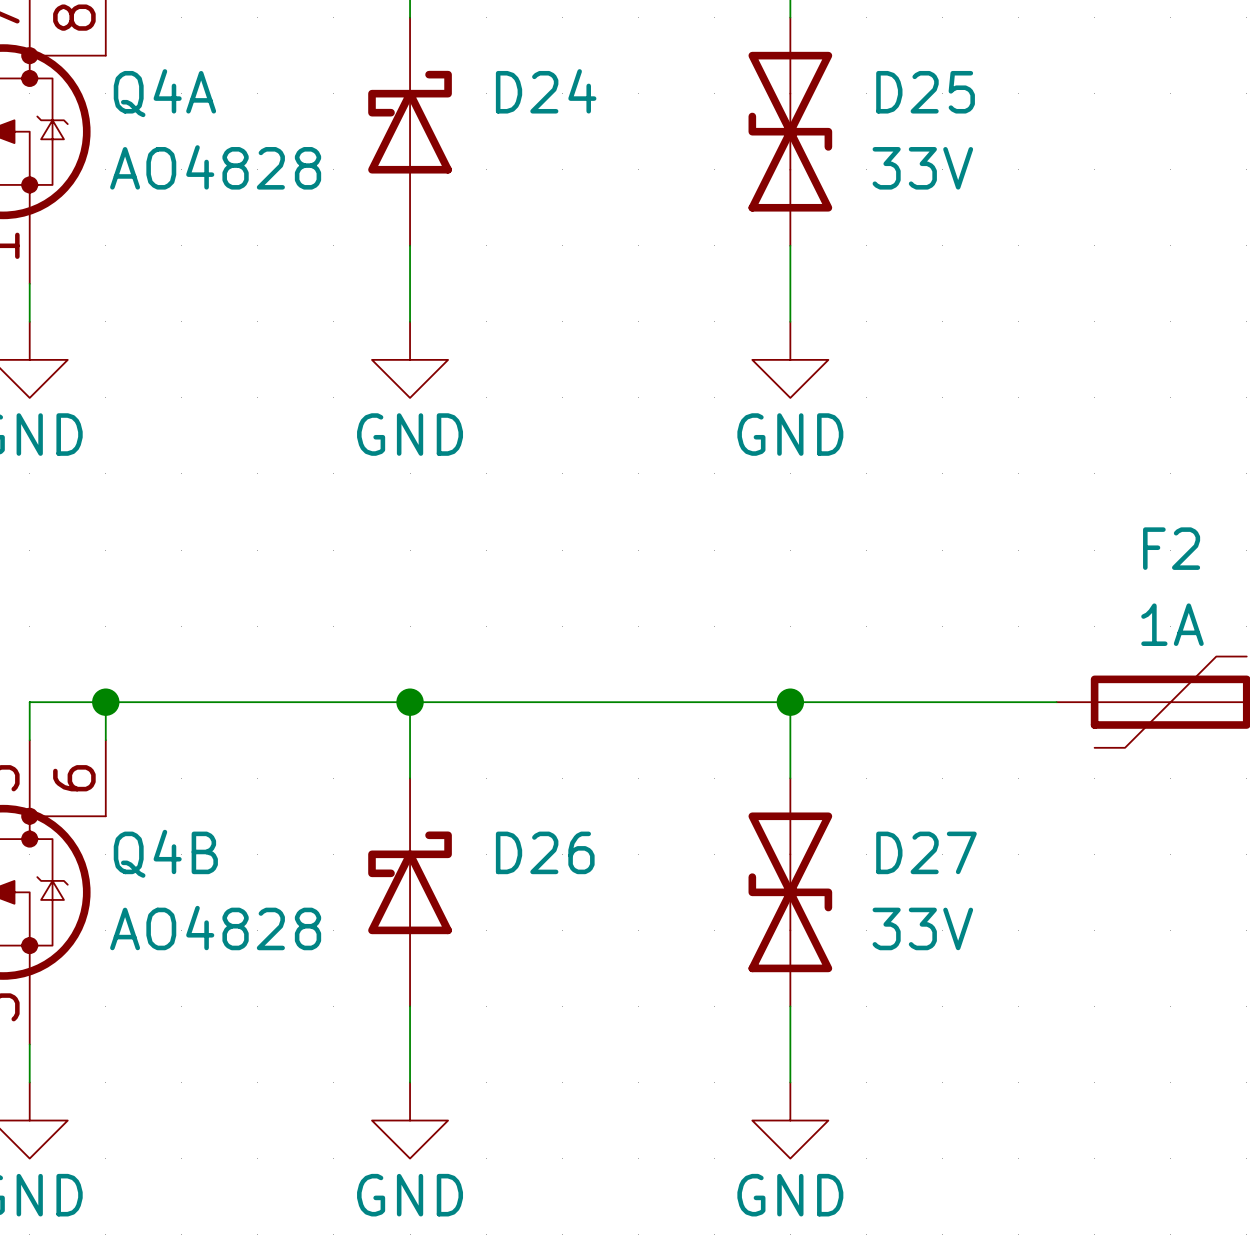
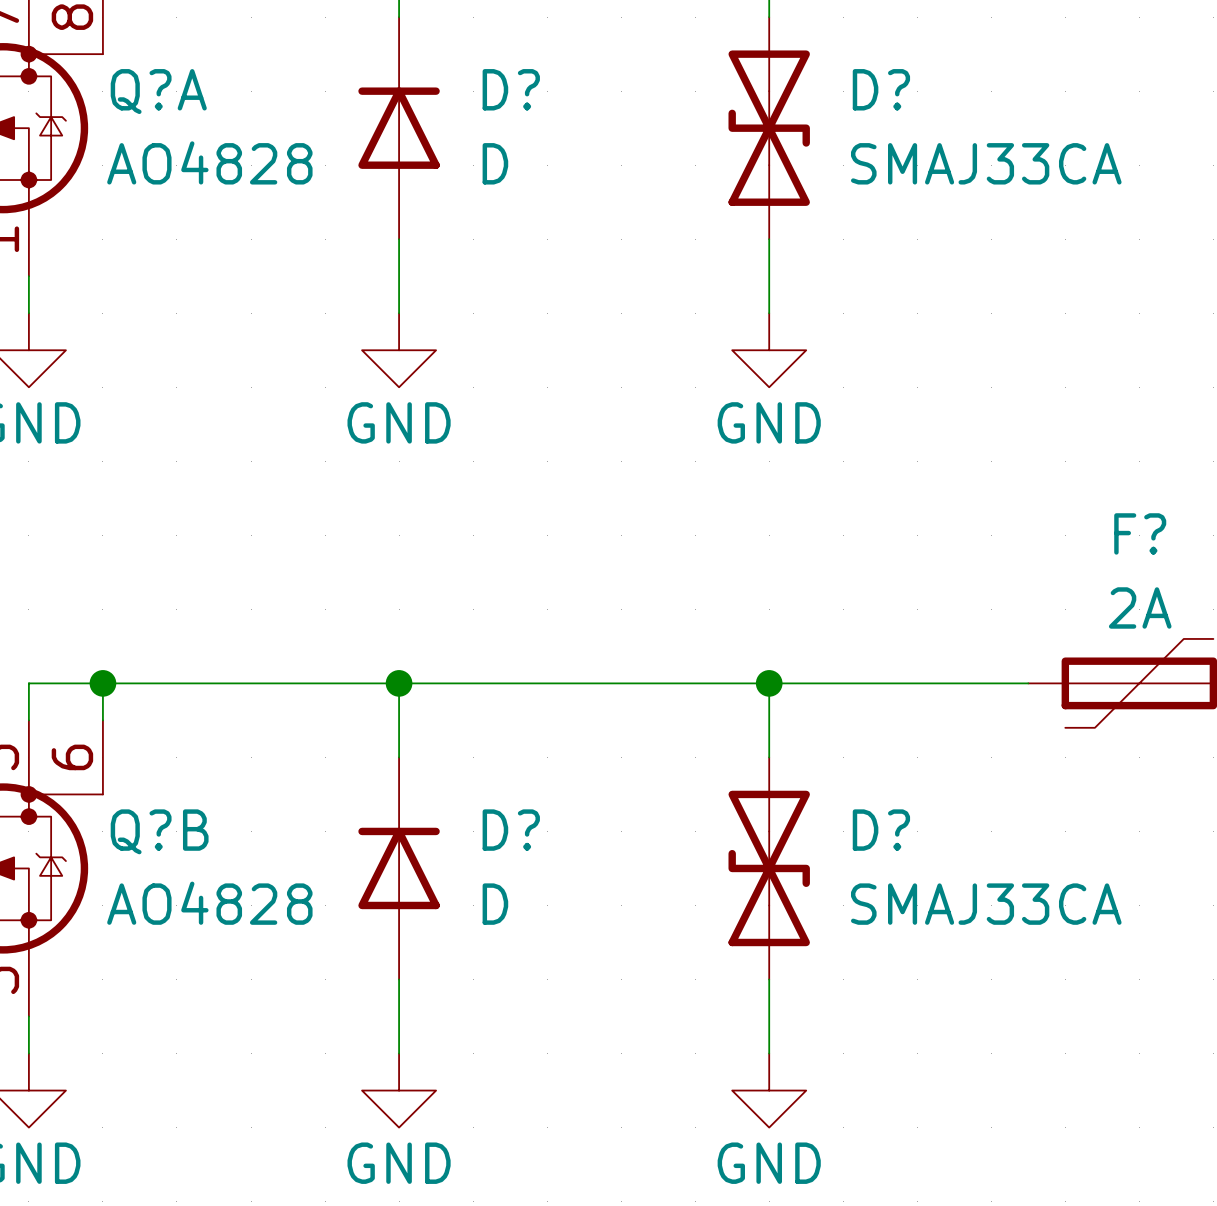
D25 name: D25 (925, 92) -> D? (881, 89)
Q4A name: Q4A (164, 93) -> Q?A (158, 91)
D24: (410, 131) -> none
D?: none -> D (399, 128)
D25 value: 33V (922, 168) -> SMAJ33CA (986, 163)
F2 name: F2 (1171, 548) -> F? (1140, 533)
F2 value: 1A (1172, 624) -> 2A (1140, 607)
D27 name: D27 (926, 852) -> D? (881, 830)
Q4B name: Q4B (165, 853) -> Q?B (159, 831)
D26: (410, 892) -> none
D?: none -> D (399, 868)
D27 value: 33V (922, 928) -> SMAJ33CA (986, 904)

